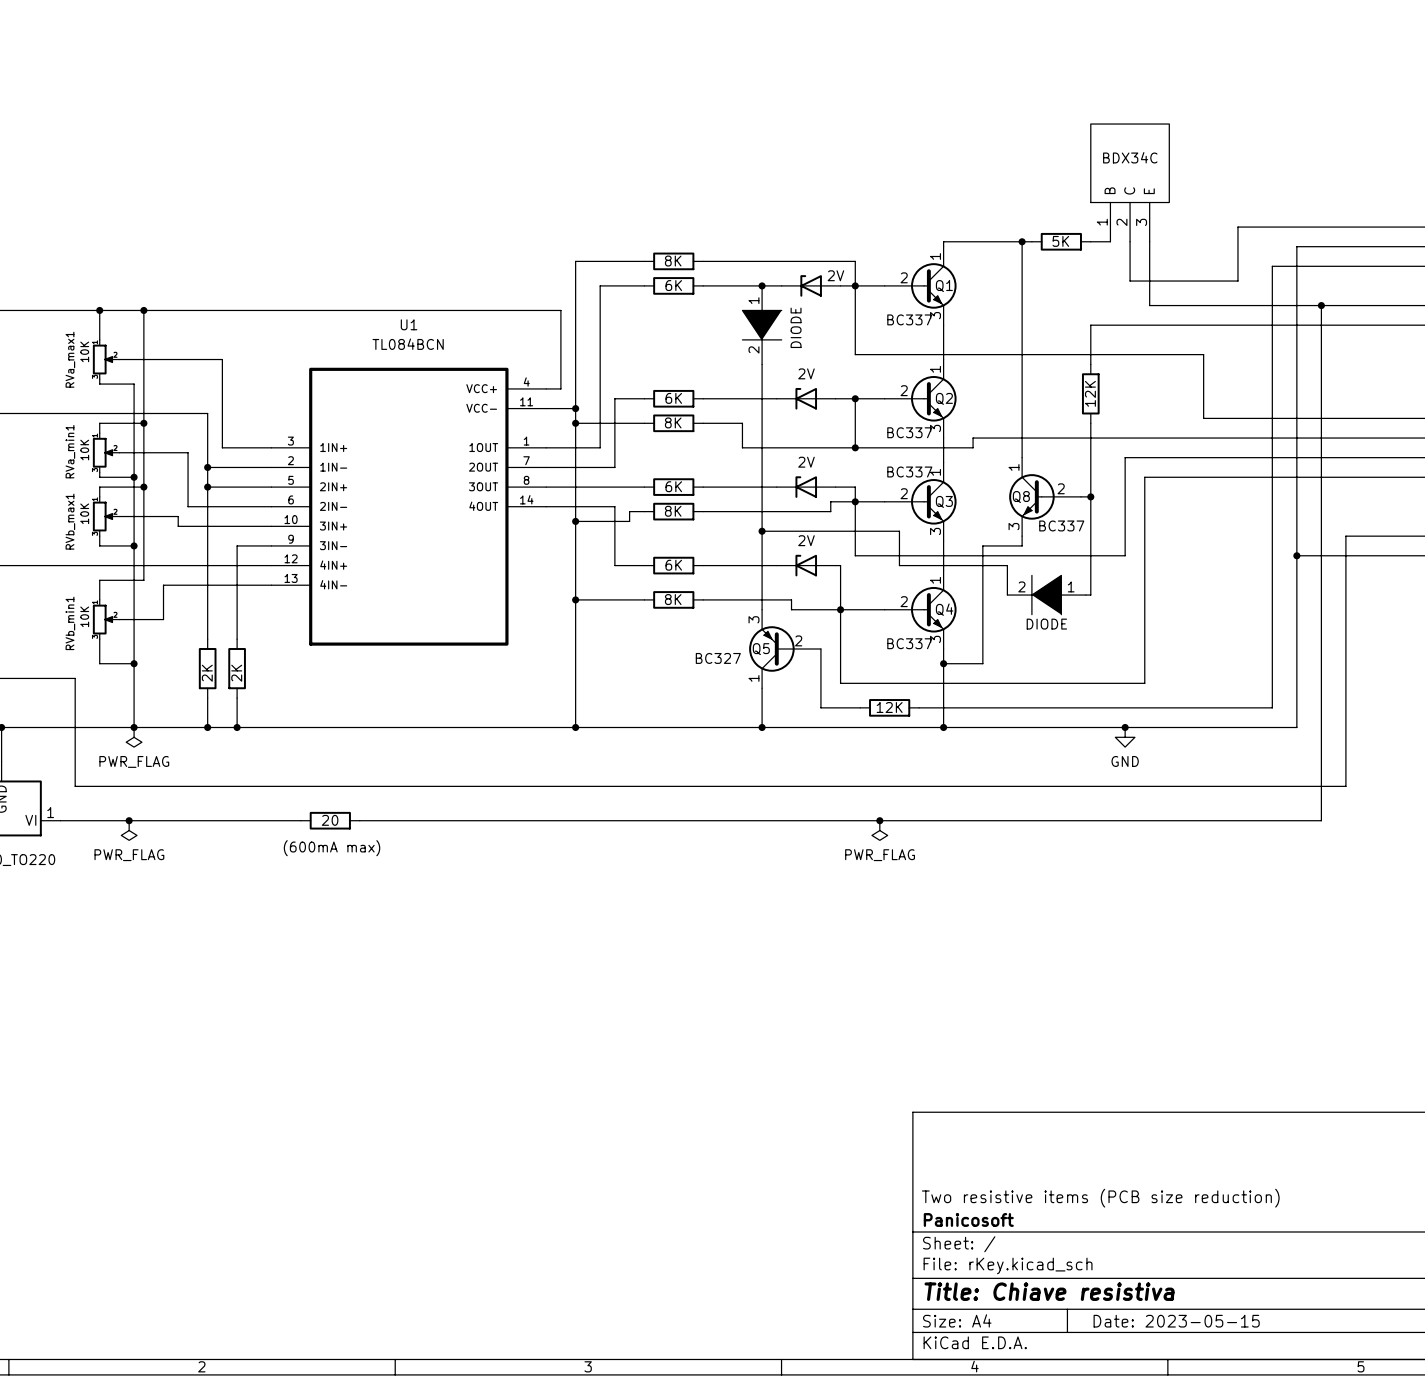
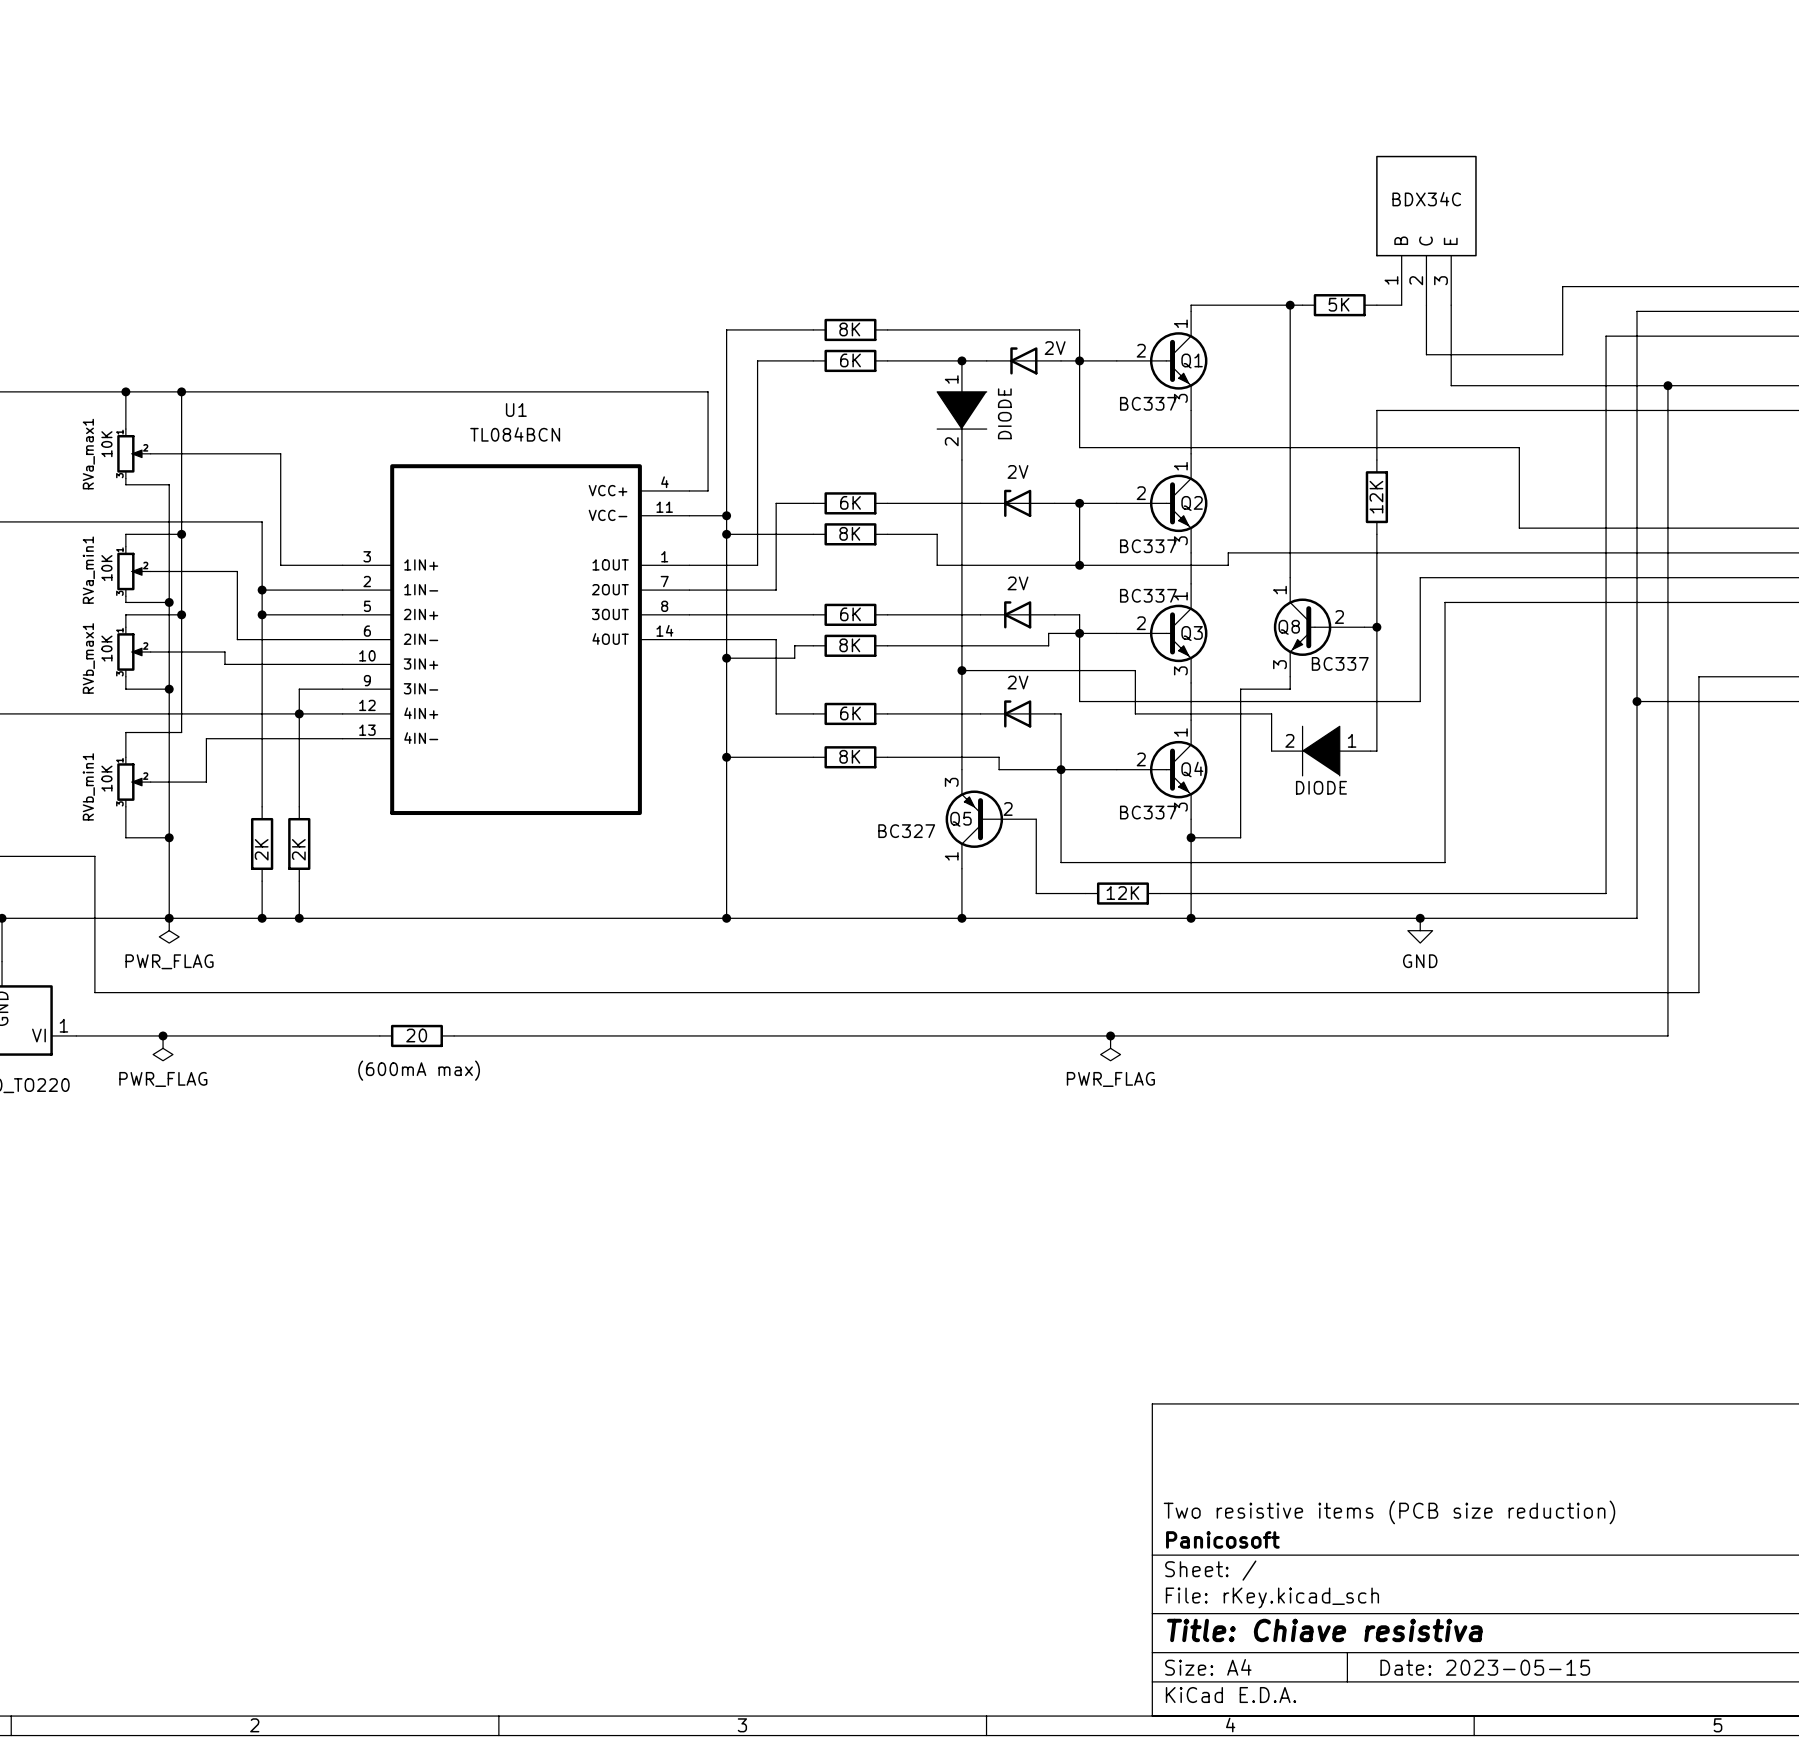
junction: none -> (299, 713)

